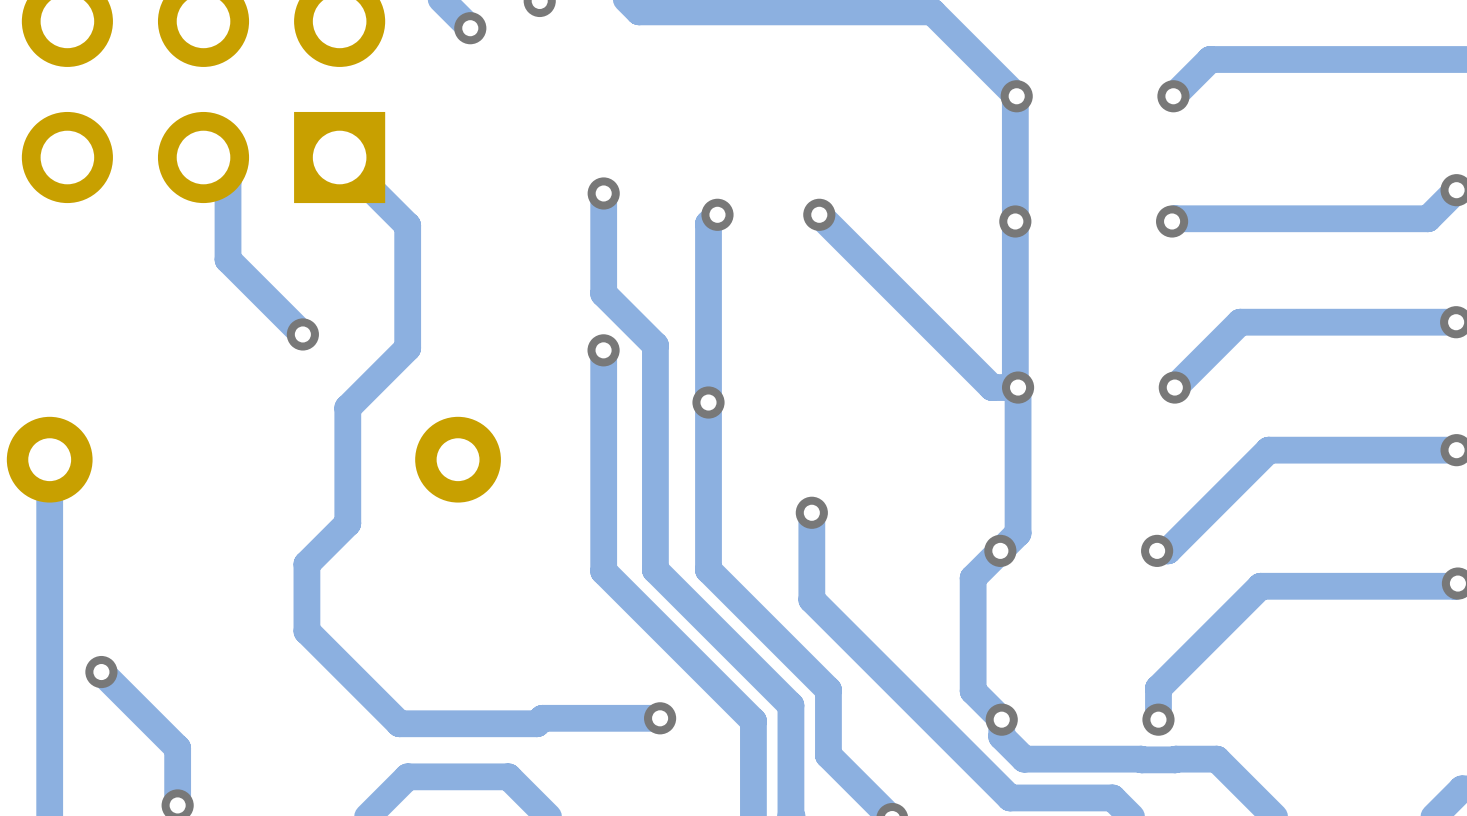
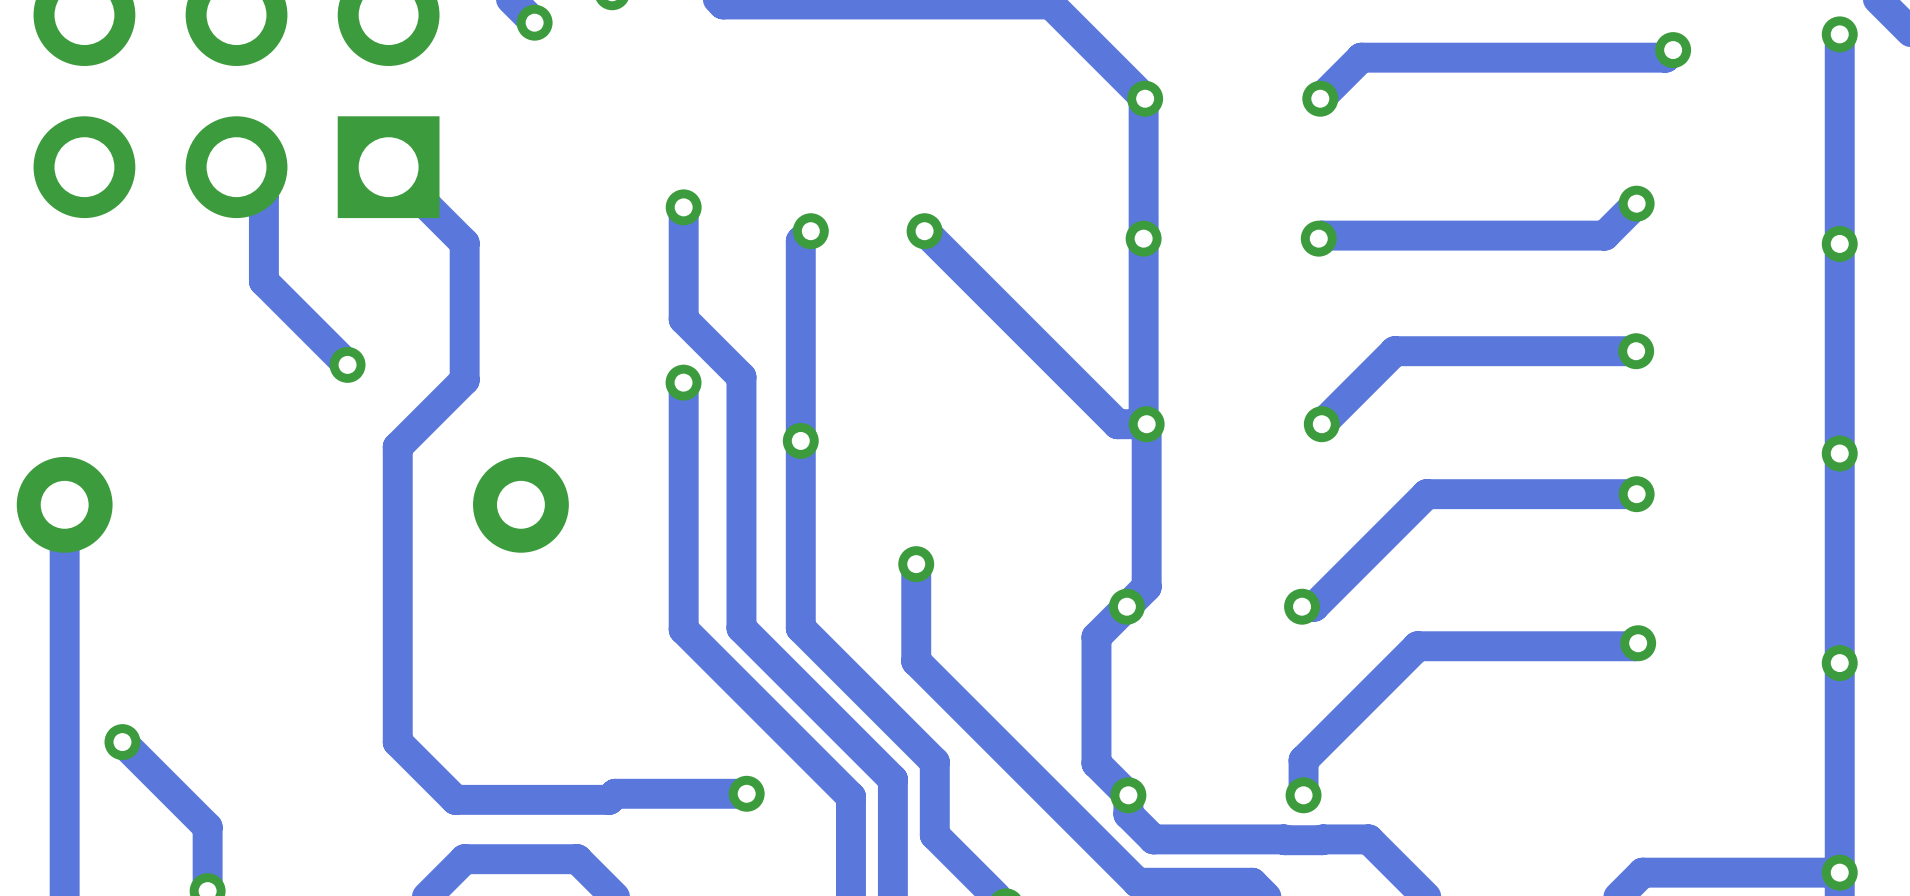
track: (347, 523) (306, 564) (306, 631) (347, 672) -> (397, 575) (397, 742)

